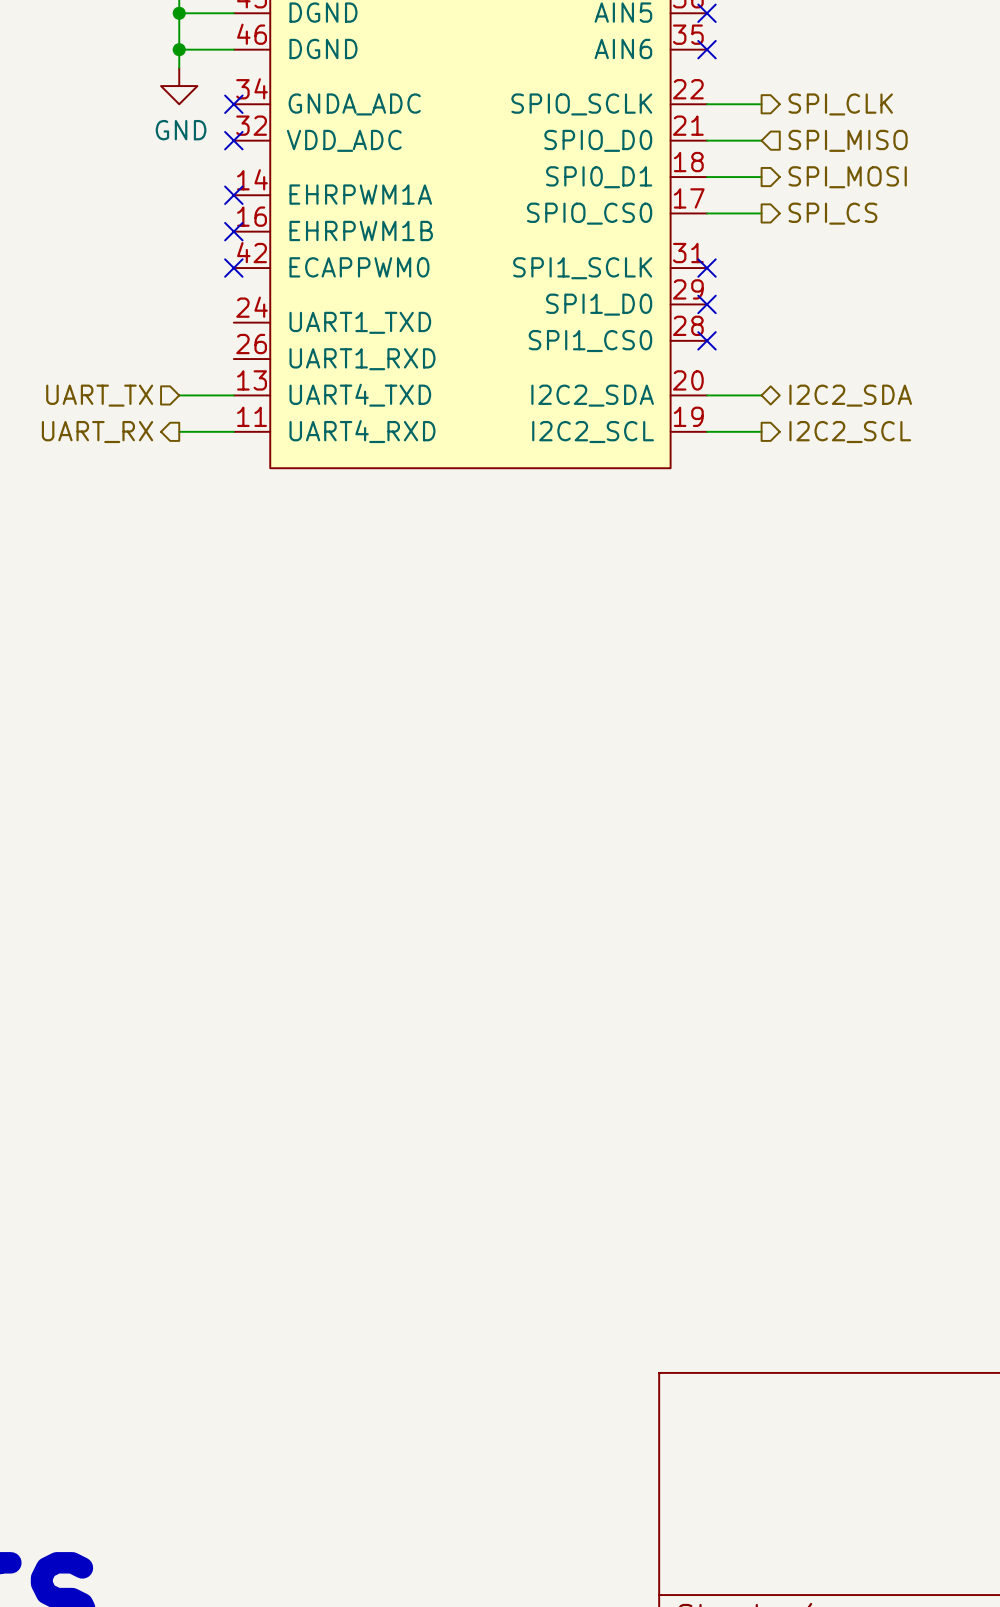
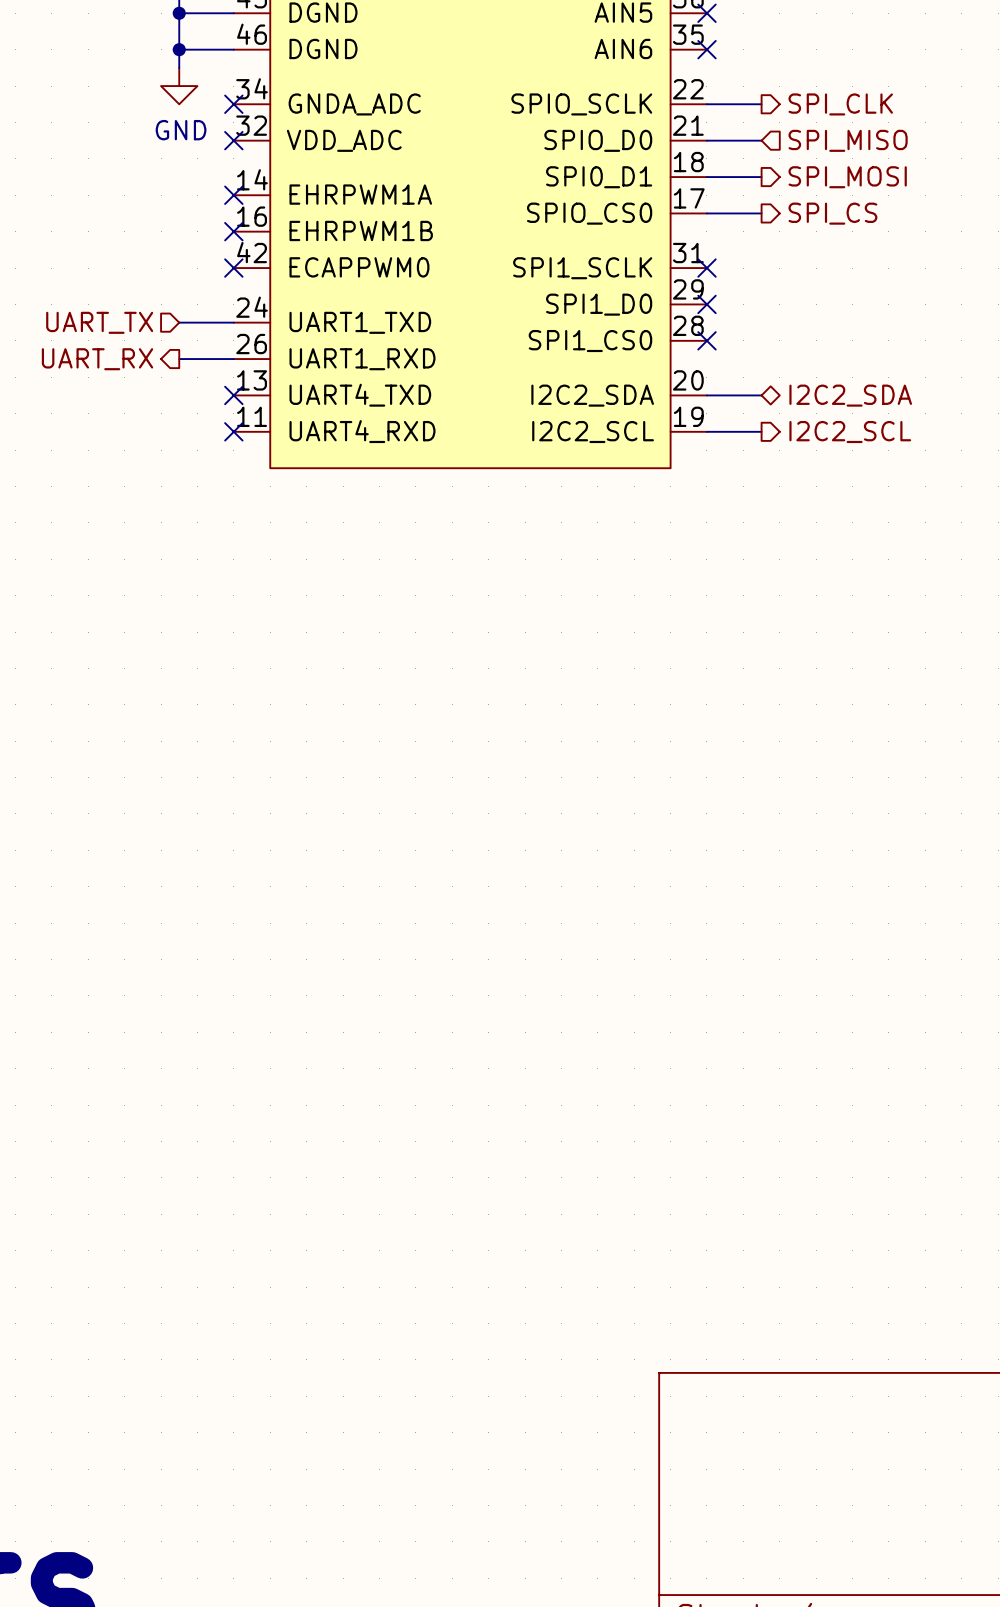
hierarchical label position: UART_TX (99, 395) -> UART_TX (99, 322)
wire: (179, 395) (233, 395) -> (179, 359) (233, 359)
no-connect mark: none -> (233, 395)
wire: (179, 431) (233, 431) -> (179, 322) (233, 322)
no-connect mark: none -> (233, 431)
hierarchical label position: UART_RX (97, 432) -> UART_RX (97, 359)

